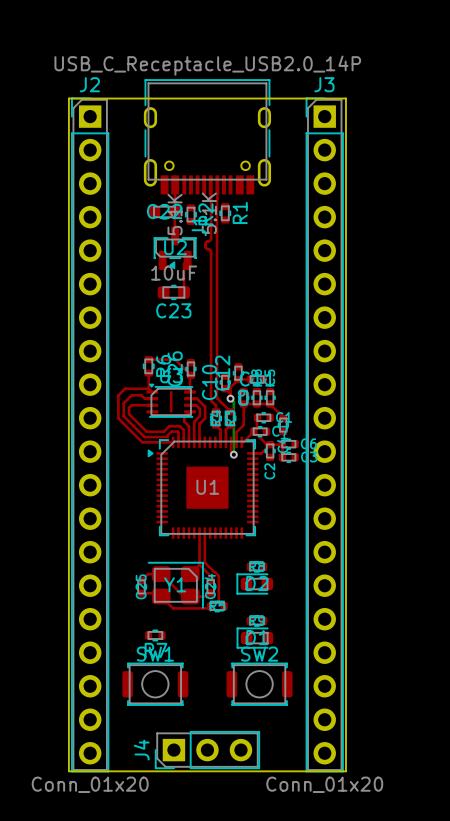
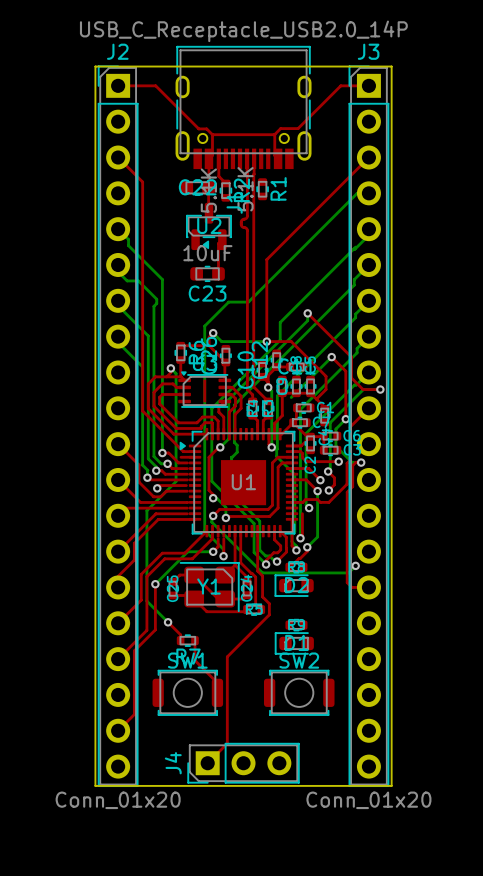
top track: none -> (118, 85) (155, 85) (198, 128) (206, 128) (212, 134)
top track: none -> (368, 85) (340, 85) (298, 128) (280, 128) (274, 134) (212, 134)
top track: none -> (212, 134) (212, 155) (208, 158)
top track: none -> (274, 134) (274, 155) (278, 158)
top track: none -> (118, 157) (142, 182) (142, 410) (183, 451) (195, 451)
top track: none -> (368, 157) (266, 259) (266, 341) (291, 341) (326, 376) (326, 389) (316, 399)
top track: none -> (218, 158) (218, 176) (225, 183)
bottom track: none -> (368, 193) (357, 193) (248, 302) (228, 302) (204, 326) (204, 530) (223, 549) (223, 556)
bottom track: none -> (118, 229) (128, 239) (128, 245) (162, 279) (162, 453)
bottom track: none -> (368, 229) (368, 235) (353, 249)
bottom track: none -> (355, 247) (280, 322) (280, 340) (211, 408) (211, 481) (254, 523) (254, 552) (266, 564) (263, 564)
bottom track: none -> (118, 264) (118, 271) (127, 280) (138, 280) (156, 299) (156, 303) (153, 306) (153, 456) (161, 463) (167, 463)
bottom track: none -> (368, 264) (354, 279) (354, 285) (234, 405) (234, 442) (237, 445) (237, 452) (231, 457) (231, 492) (259, 521) (259, 550) (265, 555) (269, 555) (277, 561)
bottom track: none -> (118, 300) (118, 305) (148, 335) (148, 458) (156, 466) (156, 470)
bottom track: none -> (368, 300) (355, 314) (355, 317) (277, 395) (276, 456) (294, 474) (294, 531) (292, 534) (292, 541) (296, 546) (296, 550)
top track: none -> (307, 313) (351, 357) (351, 377) (363, 389) (380, 389)
bottom track: none -> (307, 313) (307, 320) (228, 399) (228, 438) (220, 447)
via: none -> (307, 313)
top track: none -> (213, 333) (209, 337) (209, 345)
bottom track: none -> (213, 333) (221, 341) (266, 341)
via: none -> (213, 333)
bottom track: none -> (118, 336) (118, 342) (142, 366) (142, 465) (147, 470) (147, 477)
bottom track: none -> (368, 336) (357, 348) (357, 352) (300, 409) (300, 538)
via: none -> (266, 341)
top track: none -> (331, 357) (345, 371) (345, 419)
bottom track: none -> (331, 357) (291, 397)
via: none -> (331, 357)
top track: none -> (170, 368) (170, 372) (166, 376)
bottom track: none -> (170, 368) (176, 373) (176, 481) (146, 510) (146, 601) (168, 622)
via: none -> (170, 368)
bottom track: none -> (368, 372) (306, 433) (306, 505) (309, 508)
bottom track: none -> (380, 389) (363, 389) (330, 422) (330, 469) (328, 471)
via: none -> (380, 389)
top track: none -> (368, 408) (350, 427) (350, 460) (347, 463) (347, 484) (328, 502) (320, 502) (317, 499) (292, 502)
bottom track: none -> (345, 419) (335, 429) (335, 446) (352, 462) (361, 462)
via: none -> (345, 419)
top track: none -> (118, 444) (138, 464) (138, 482) (153, 496) (160, 496) (166, 491) (187, 491)
top track: none -> (220, 447) (208, 457) (208, 490) (213, 494) (213, 498)
via: none -> (220, 447)
top track: none -> (292, 451) (300, 451) (306, 461) (338, 461)
top track: none -> (162, 453) (168, 453) (178, 462) (187, 462)
via: none -> (162, 453)
top track: none -> (181, 457) (195, 457)
top track: none -> (292, 457) (278, 457) (272, 462) (272, 505) (268, 509) (219, 509) (213, 515)
via: none -> (338, 461)
top track: none -> (361, 462) (355, 462) (352, 465) (352, 486) (347, 492) (347, 582) (351, 587) (368, 587)
via: none -> (361, 462)
top track: none -> (292, 462) (282, 462) (278, 467) (278, 508) (269, 516) (225, 517)
top track: none -> (167, 463) (172, 468) (187, 468)
via: none -> (167, 463)
top track: none -> (292, 468) (308, 468) (320, 480)
top track: none -> (156, 470) (161, 470) (165, 474) (187, 474)
via: none -> (156, 470)
top track: none -> (328, 471) (334, 477) (334, 484) (328, 490)
via: none -> (328, 471)
top track: none -> (147, 477) (149, 479) (187, 479)
via: none -> (147, 477)
top track: none -> (118, 479) (140, 502) (187, 502)
top track: none -> (292, 479) (306, 479) (317, 491)
via: none -> (320, 480)
top track: none -> (186, 485) (158, 485) (157, 488)
via: none -> (157, 488)
via: none -> (328, 490)
bottom track: none -> (317, 491) (317, 536) (307, 547)
via: none -> (317, 491)
bottom track: none -> (213, 498) (216, 498) (225, 507) (225, 517)
via: none -> (213, 498)
top track: none -> (187, 508) (125, 508) (118, 515)
via: none -> (309, 508)
top track: none -> (187, 513) (155, 513) (118, 551)
top track: none -> (302, 513) (302, 536) (300, 538)
bottom track: none -> (213, 515) (211, 522) (262, 572) (348, 572) (355, 565)
via: none -> (213, 515)
via: none -> (225, 517)
top track: none -> (292, 519) (292, 545) (296, 550)
top track: none -> (194, 519) (158, 519) (134, 543) (134, 560) (118, 576) (118, 587)
top track: none -> (206, 531) (184, 553) (162, 553) (141, 574) (141, 600) (118, 623)
top track: none -> (212, 531) (212, 538) (192, 558) (164, 558) (146, 576) (146, 630) (118, 659)
top track: none -> (257, 531) (257, 571) (262, 575) (262, 596) (269, 603) (269, 614) (227, 656) (227, 743) (207, 763)
top track: none -> (274, 531) (274, 539) (280, 545) (280, 549) (277, 552) (273, 552) (266, 560) (266, 564)
top track: none -> (280, 531) (286, 537) (286, 548)
via: none -> (300, 538)
top track: none -> (218, 538) (218, 546) (213, 551)
top track: none -> (223, 538) (223, 556)
top track: none -> (307, 547) (307, 551) (289, 567)
via: none -> (307, 547)
top track: none -> (286, 548) (286, 552) (277, 561)
via: none -> (296, 550)
bottom track: none -> (213, 551) (187, 551) (155, 584)
via: none -> (213, 551)
via: none -> (223, 556)
via: none -> (277, 561)
via: none -> (266, 564)
via: none -> (355, 565)
top track: none -> (155, 584) (155, 629) (134, 650) (134, 714) (118, 730)
via: none -> (155, 584)
top track: none -> (168, 622) (180, 634) (180, 640)
via: none -> (168, 622)
top track: none -> (195, 640) (195, 660) (217, 682) (217, 692)

